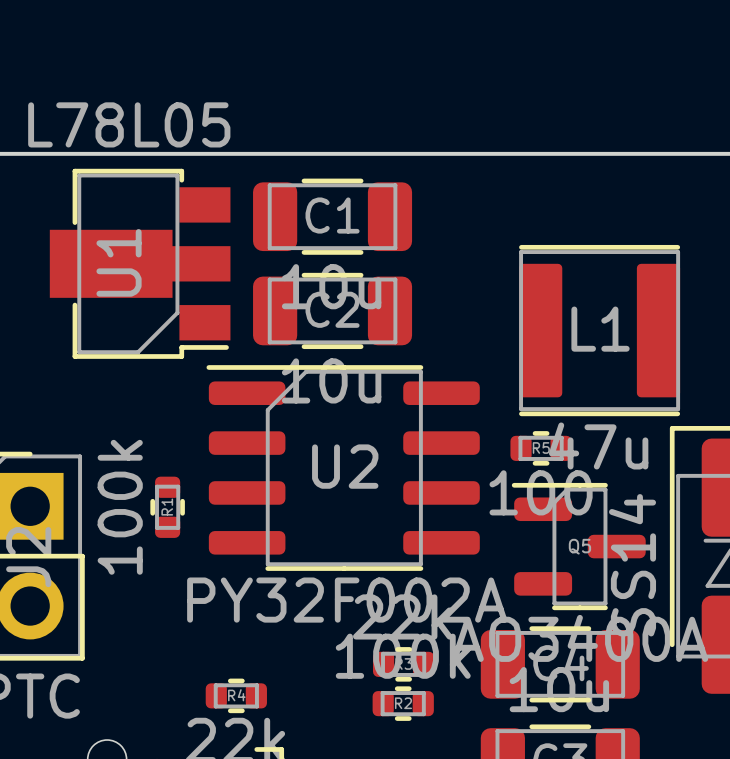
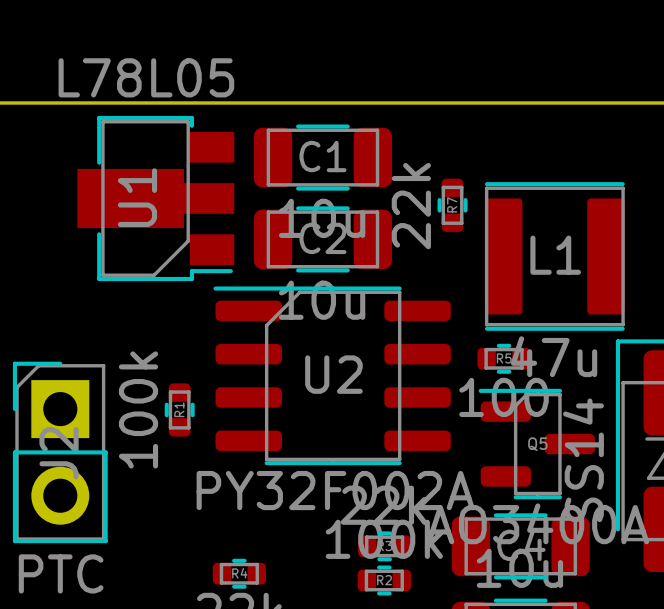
R7: none -> 22k (452, 205)

